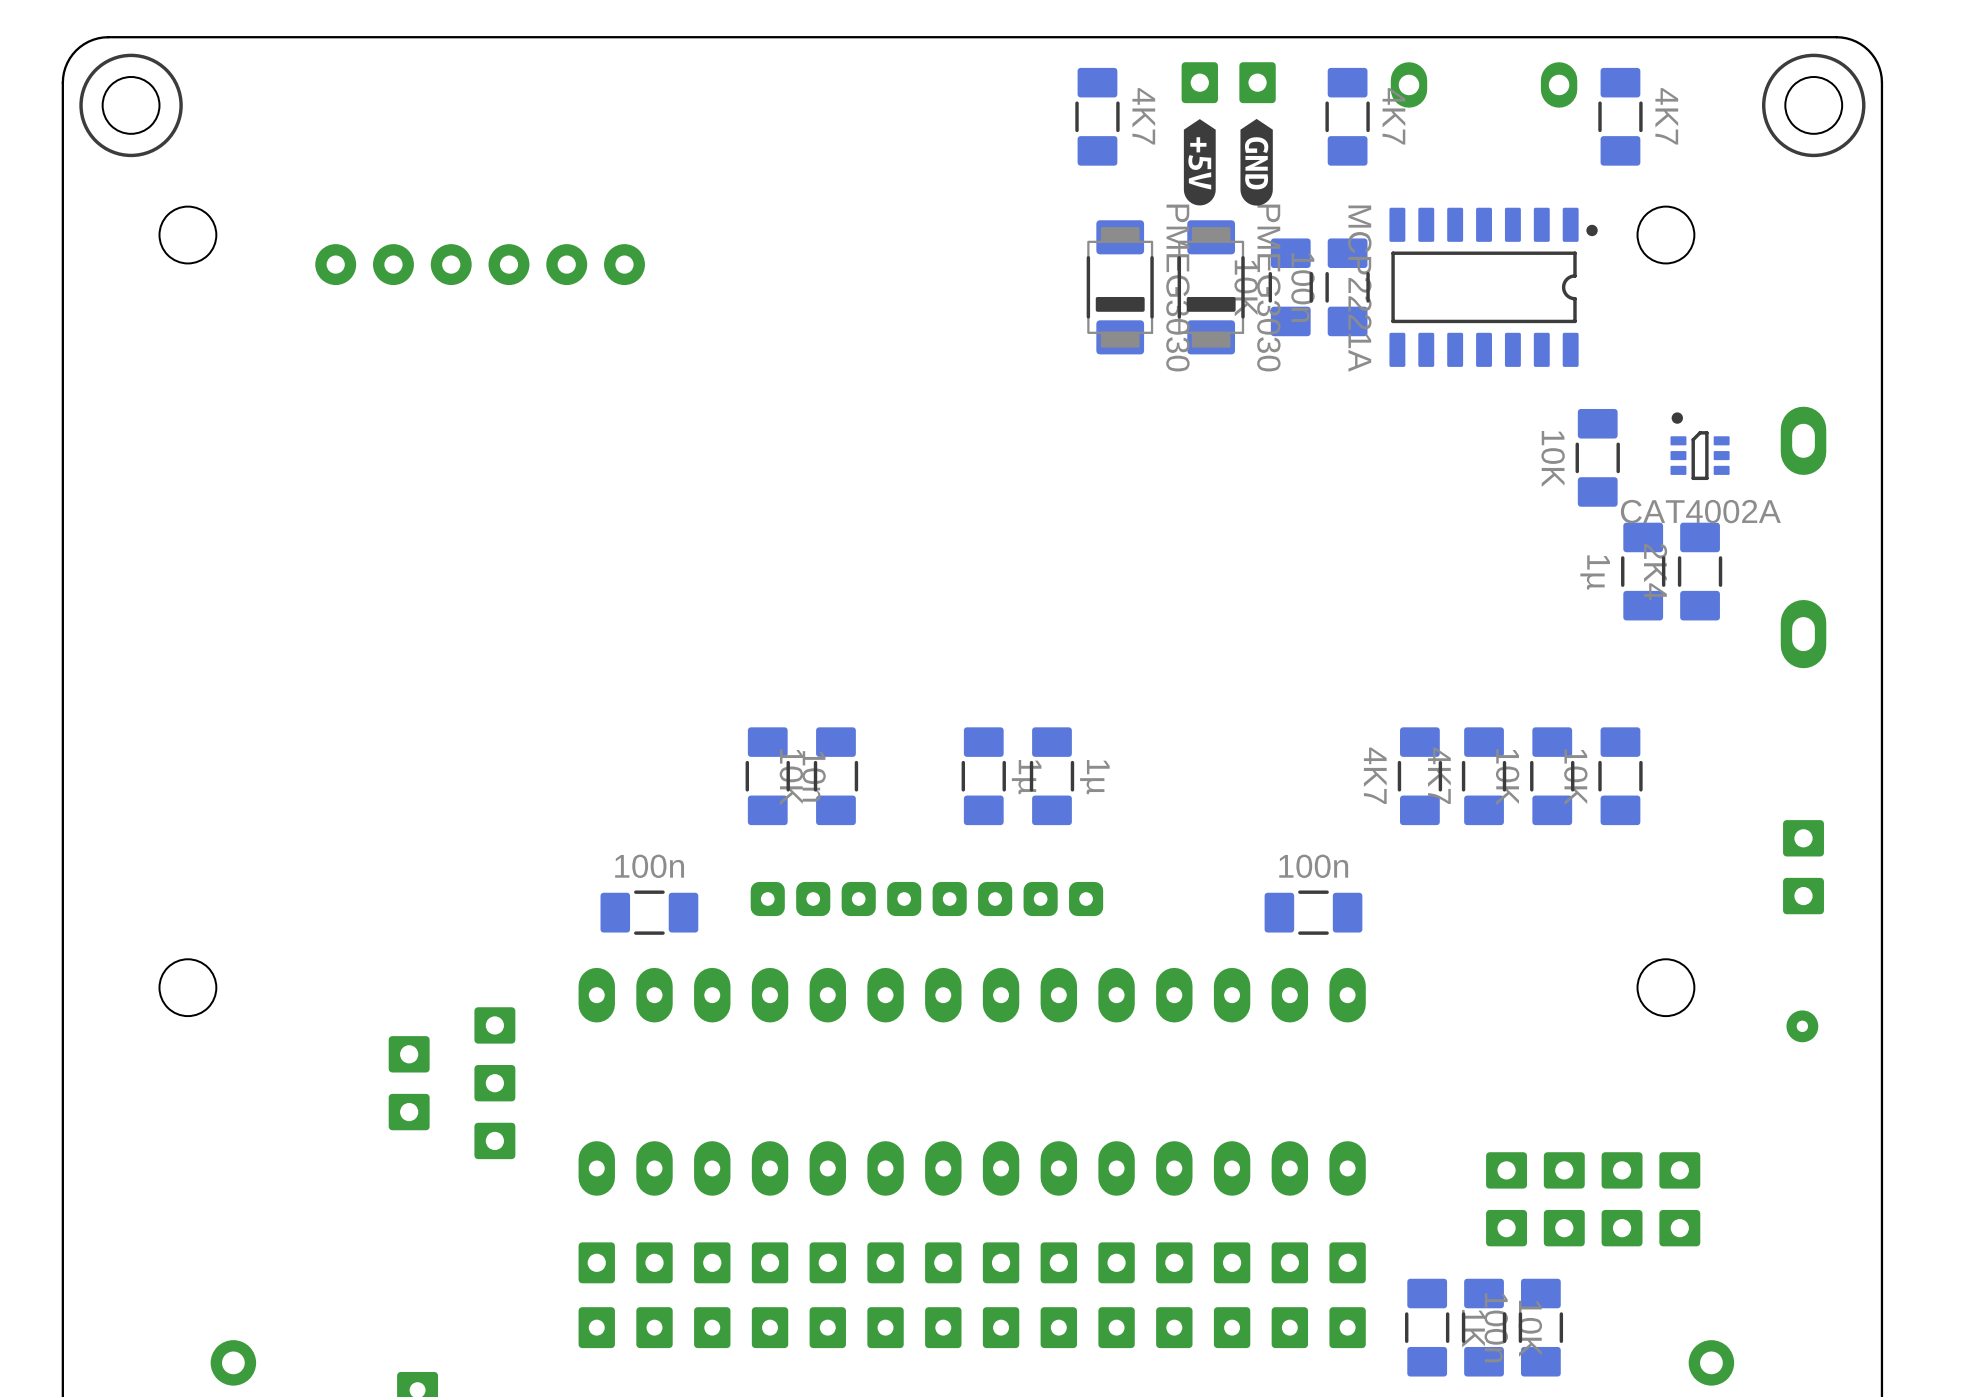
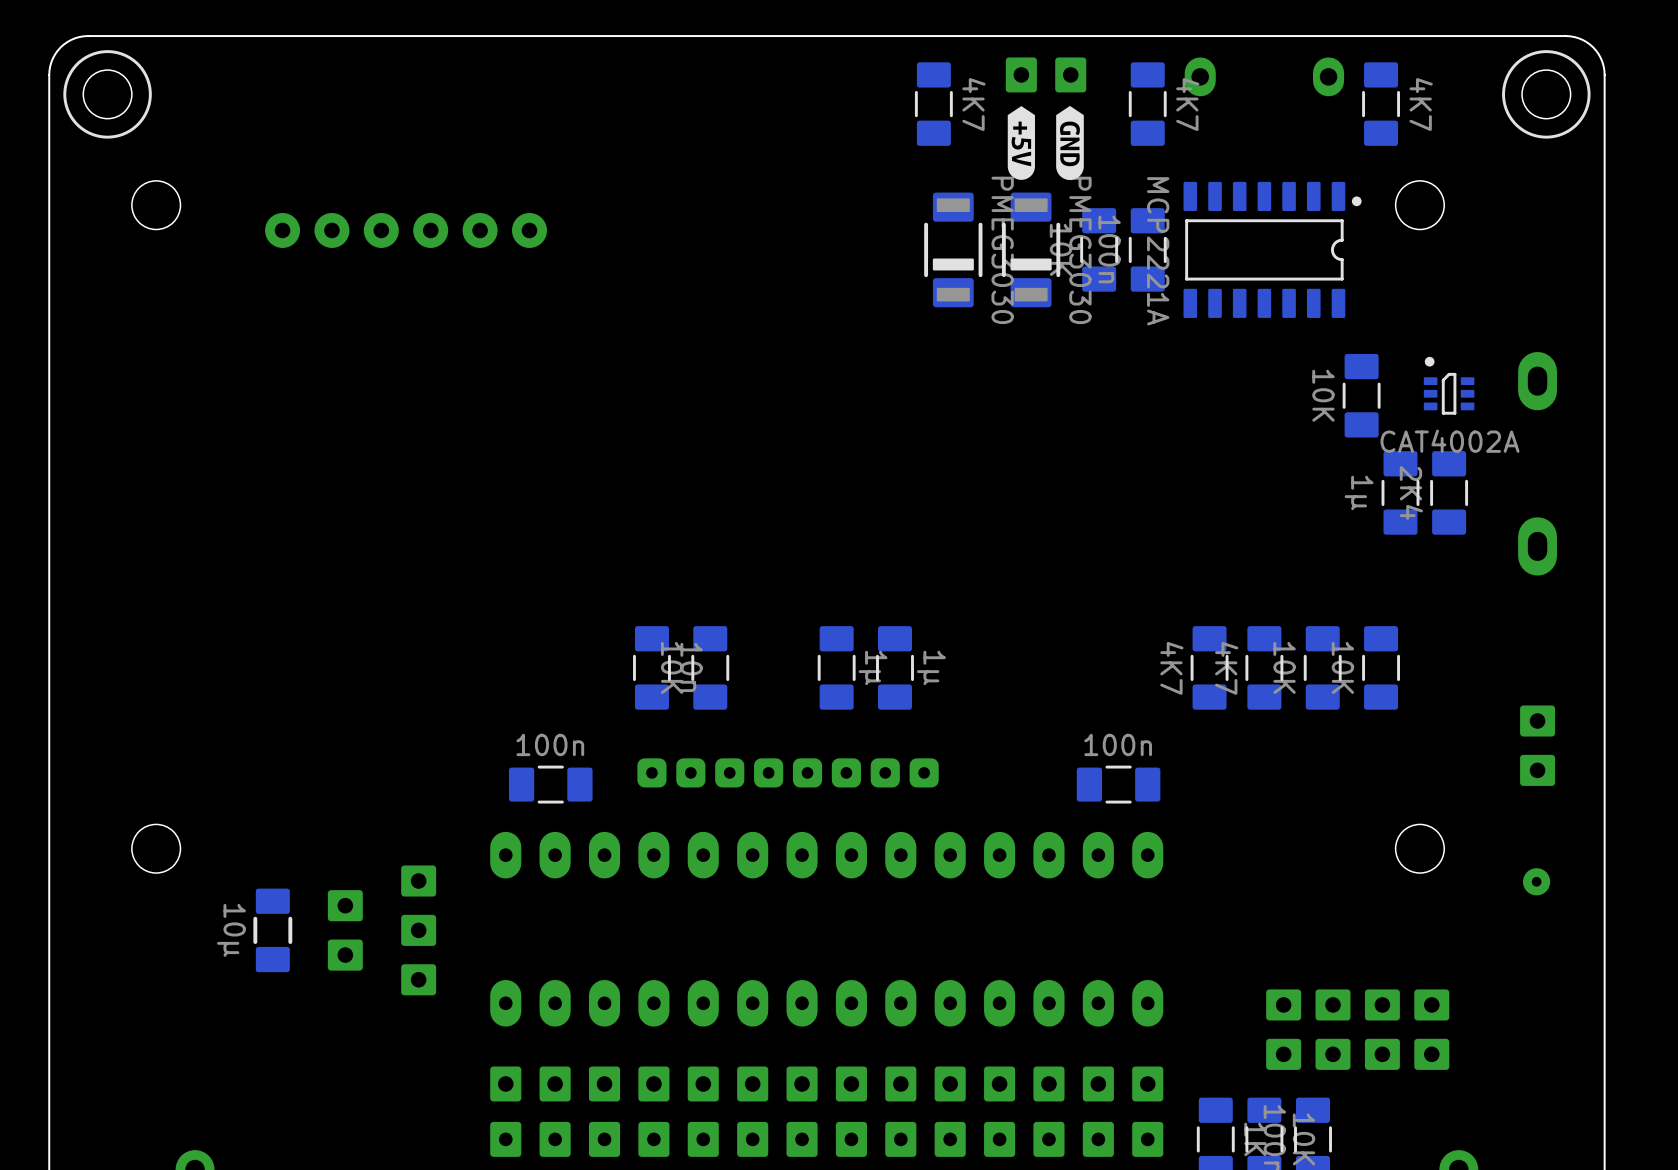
part footprint: [1086, 220, 1154, 355] -> [924, 192, 983, 308]
part footprint: [1177, 220, 1245, 355] -> [1001, 192, 1061, 308]
part: none -> 10µ (272, 930)

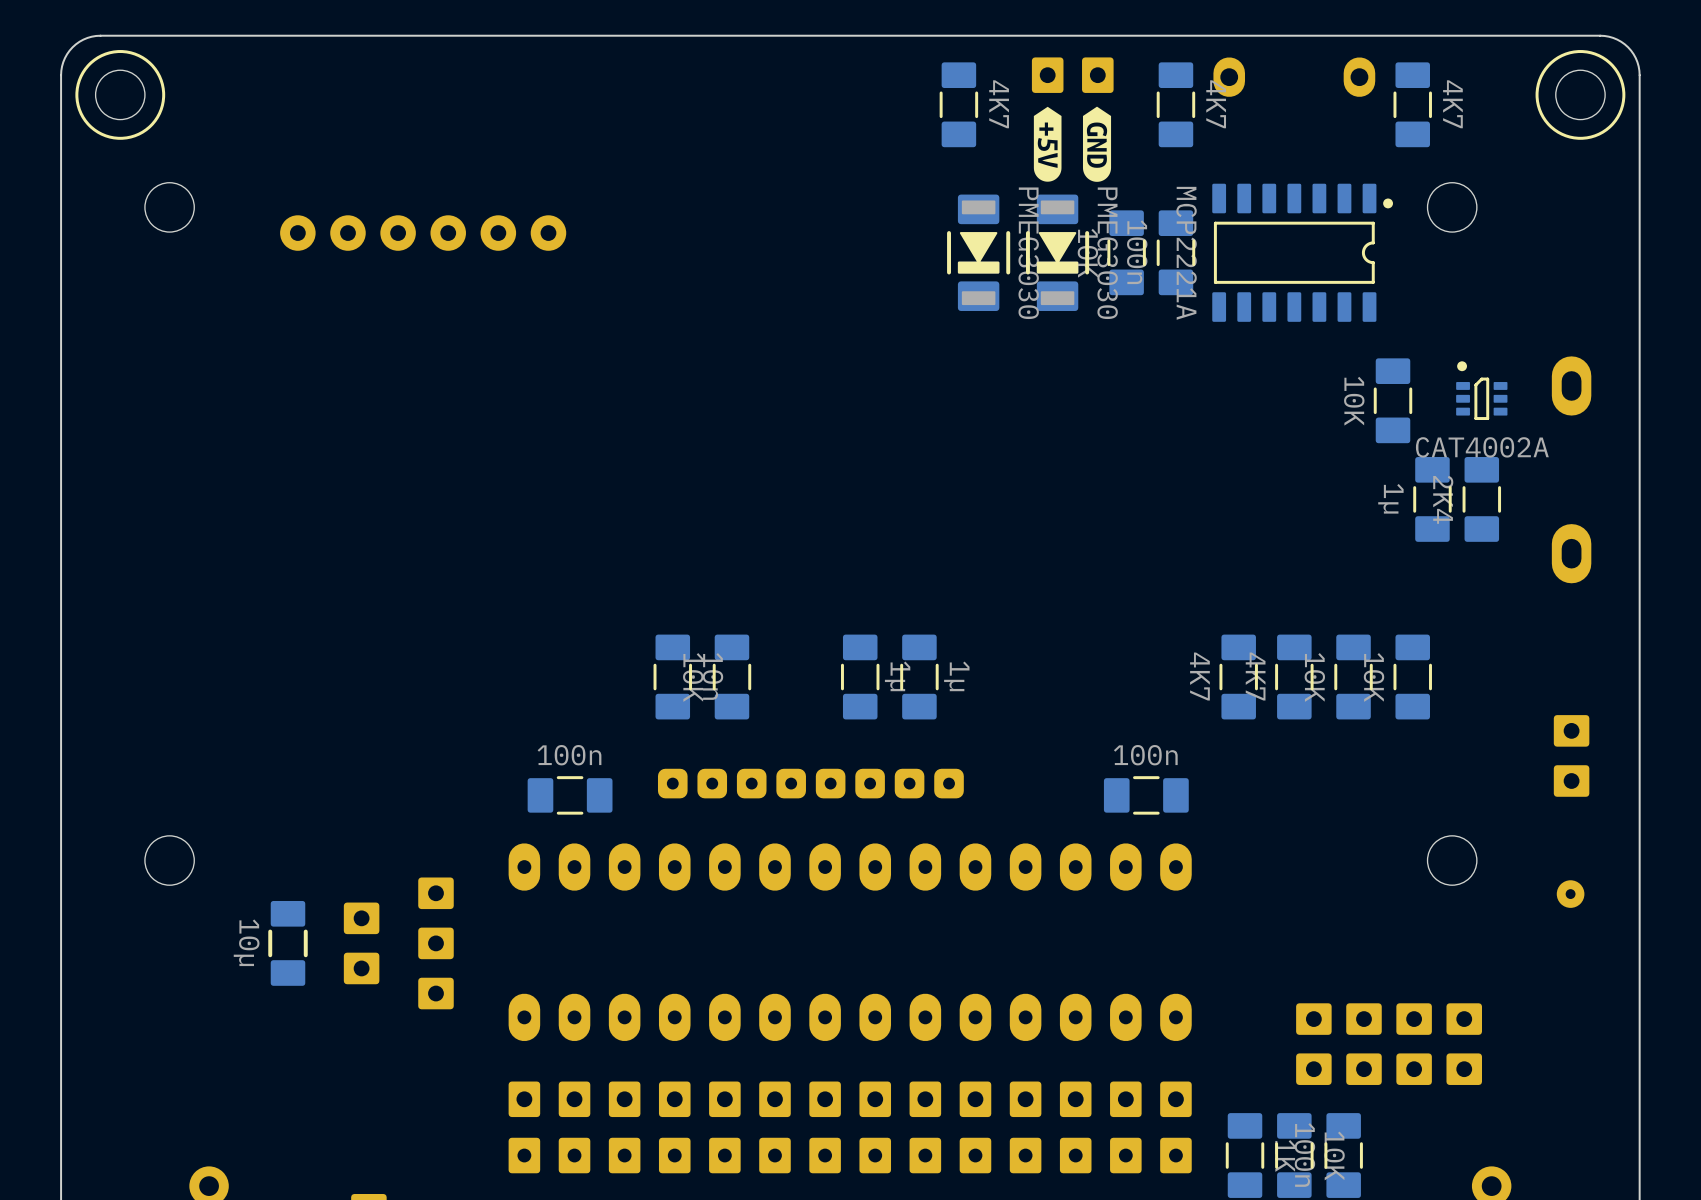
part footprint: [924, 192, 983, 308] -> [947, 194, 1011, 311]
part footprint: [1001, 192, 1061, 308] -> [1025, 194, 1090, 311]

